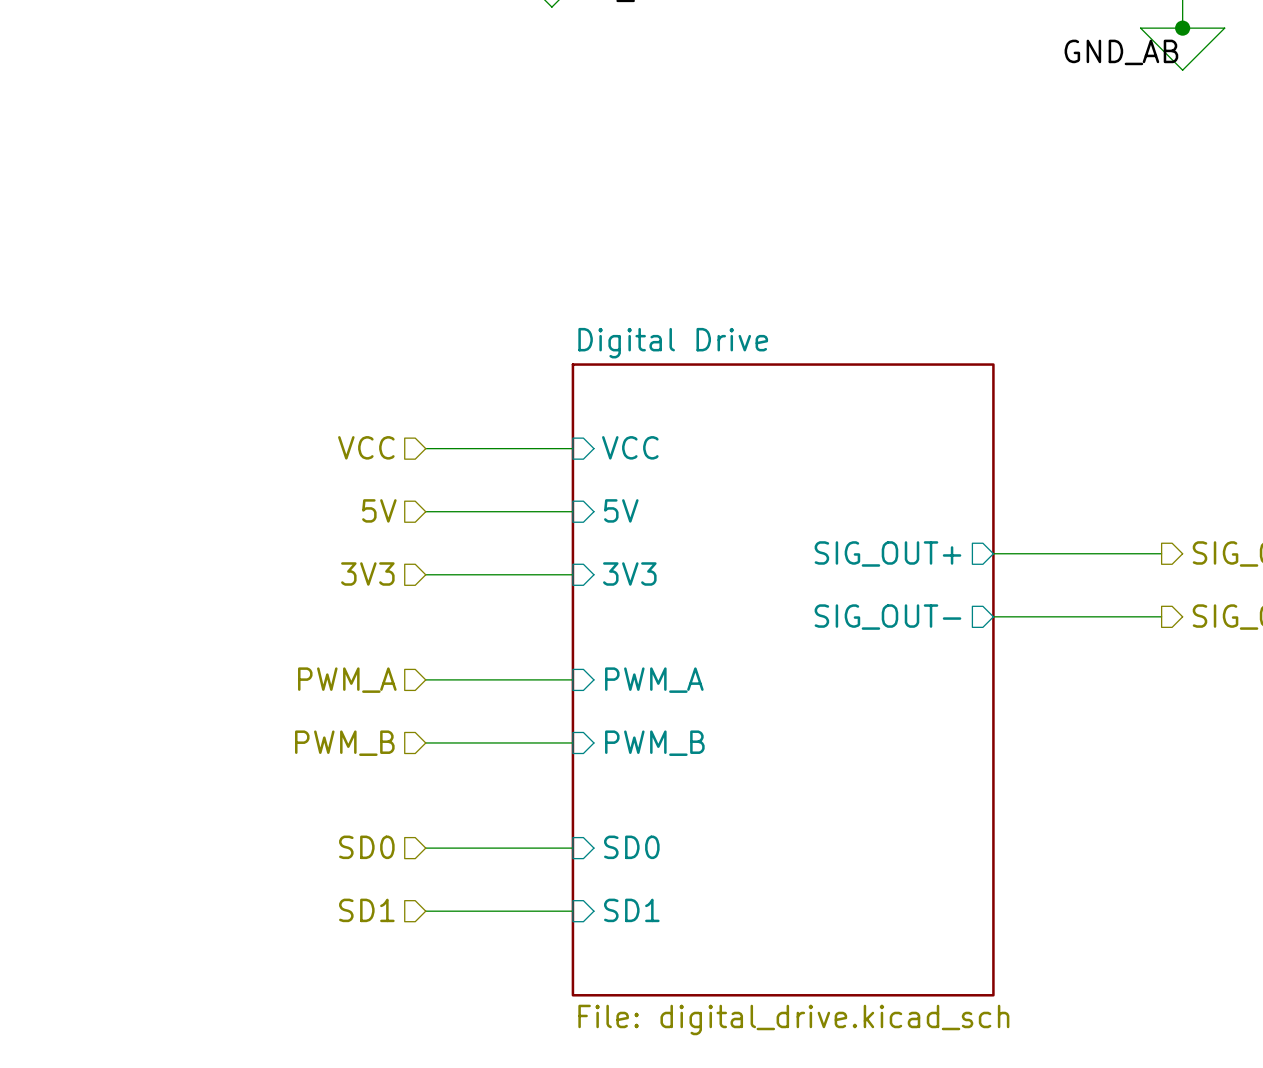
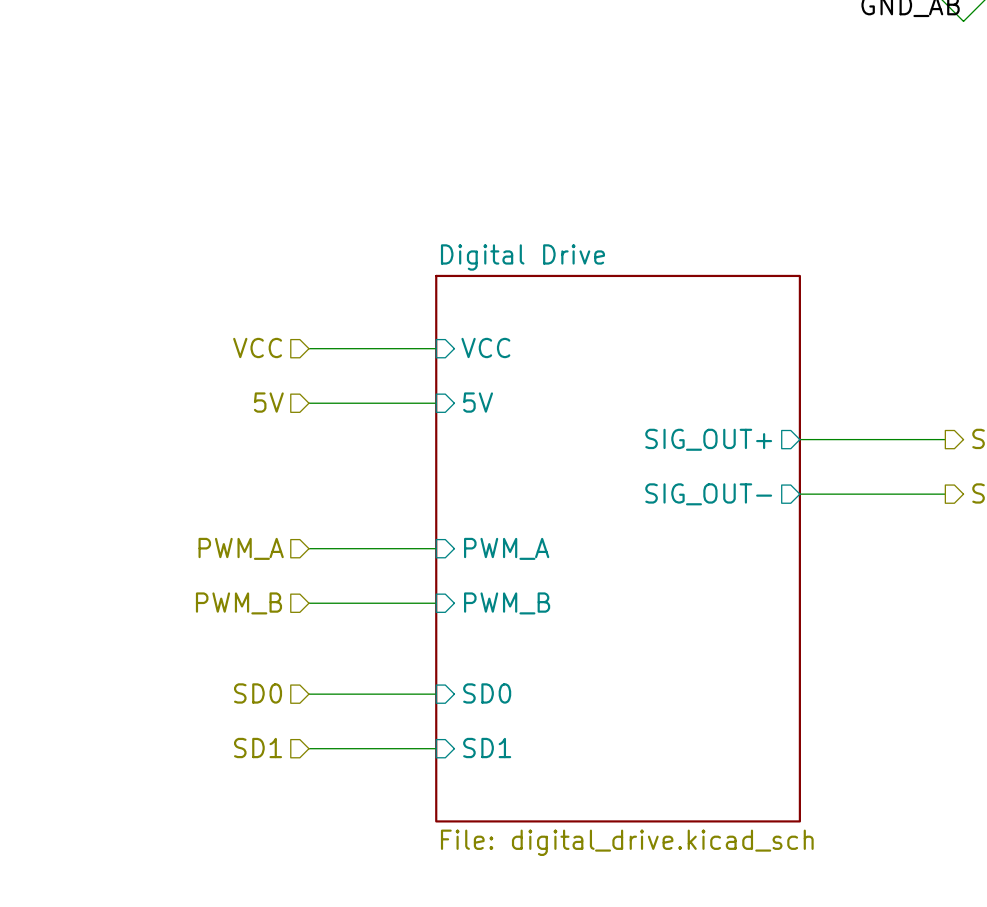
hierarchical label: 3V3 (367, 574) -> none
wire: (425, 574) (572, 574) -> none
sheet pin: 3V3 (629, 574) -> none

